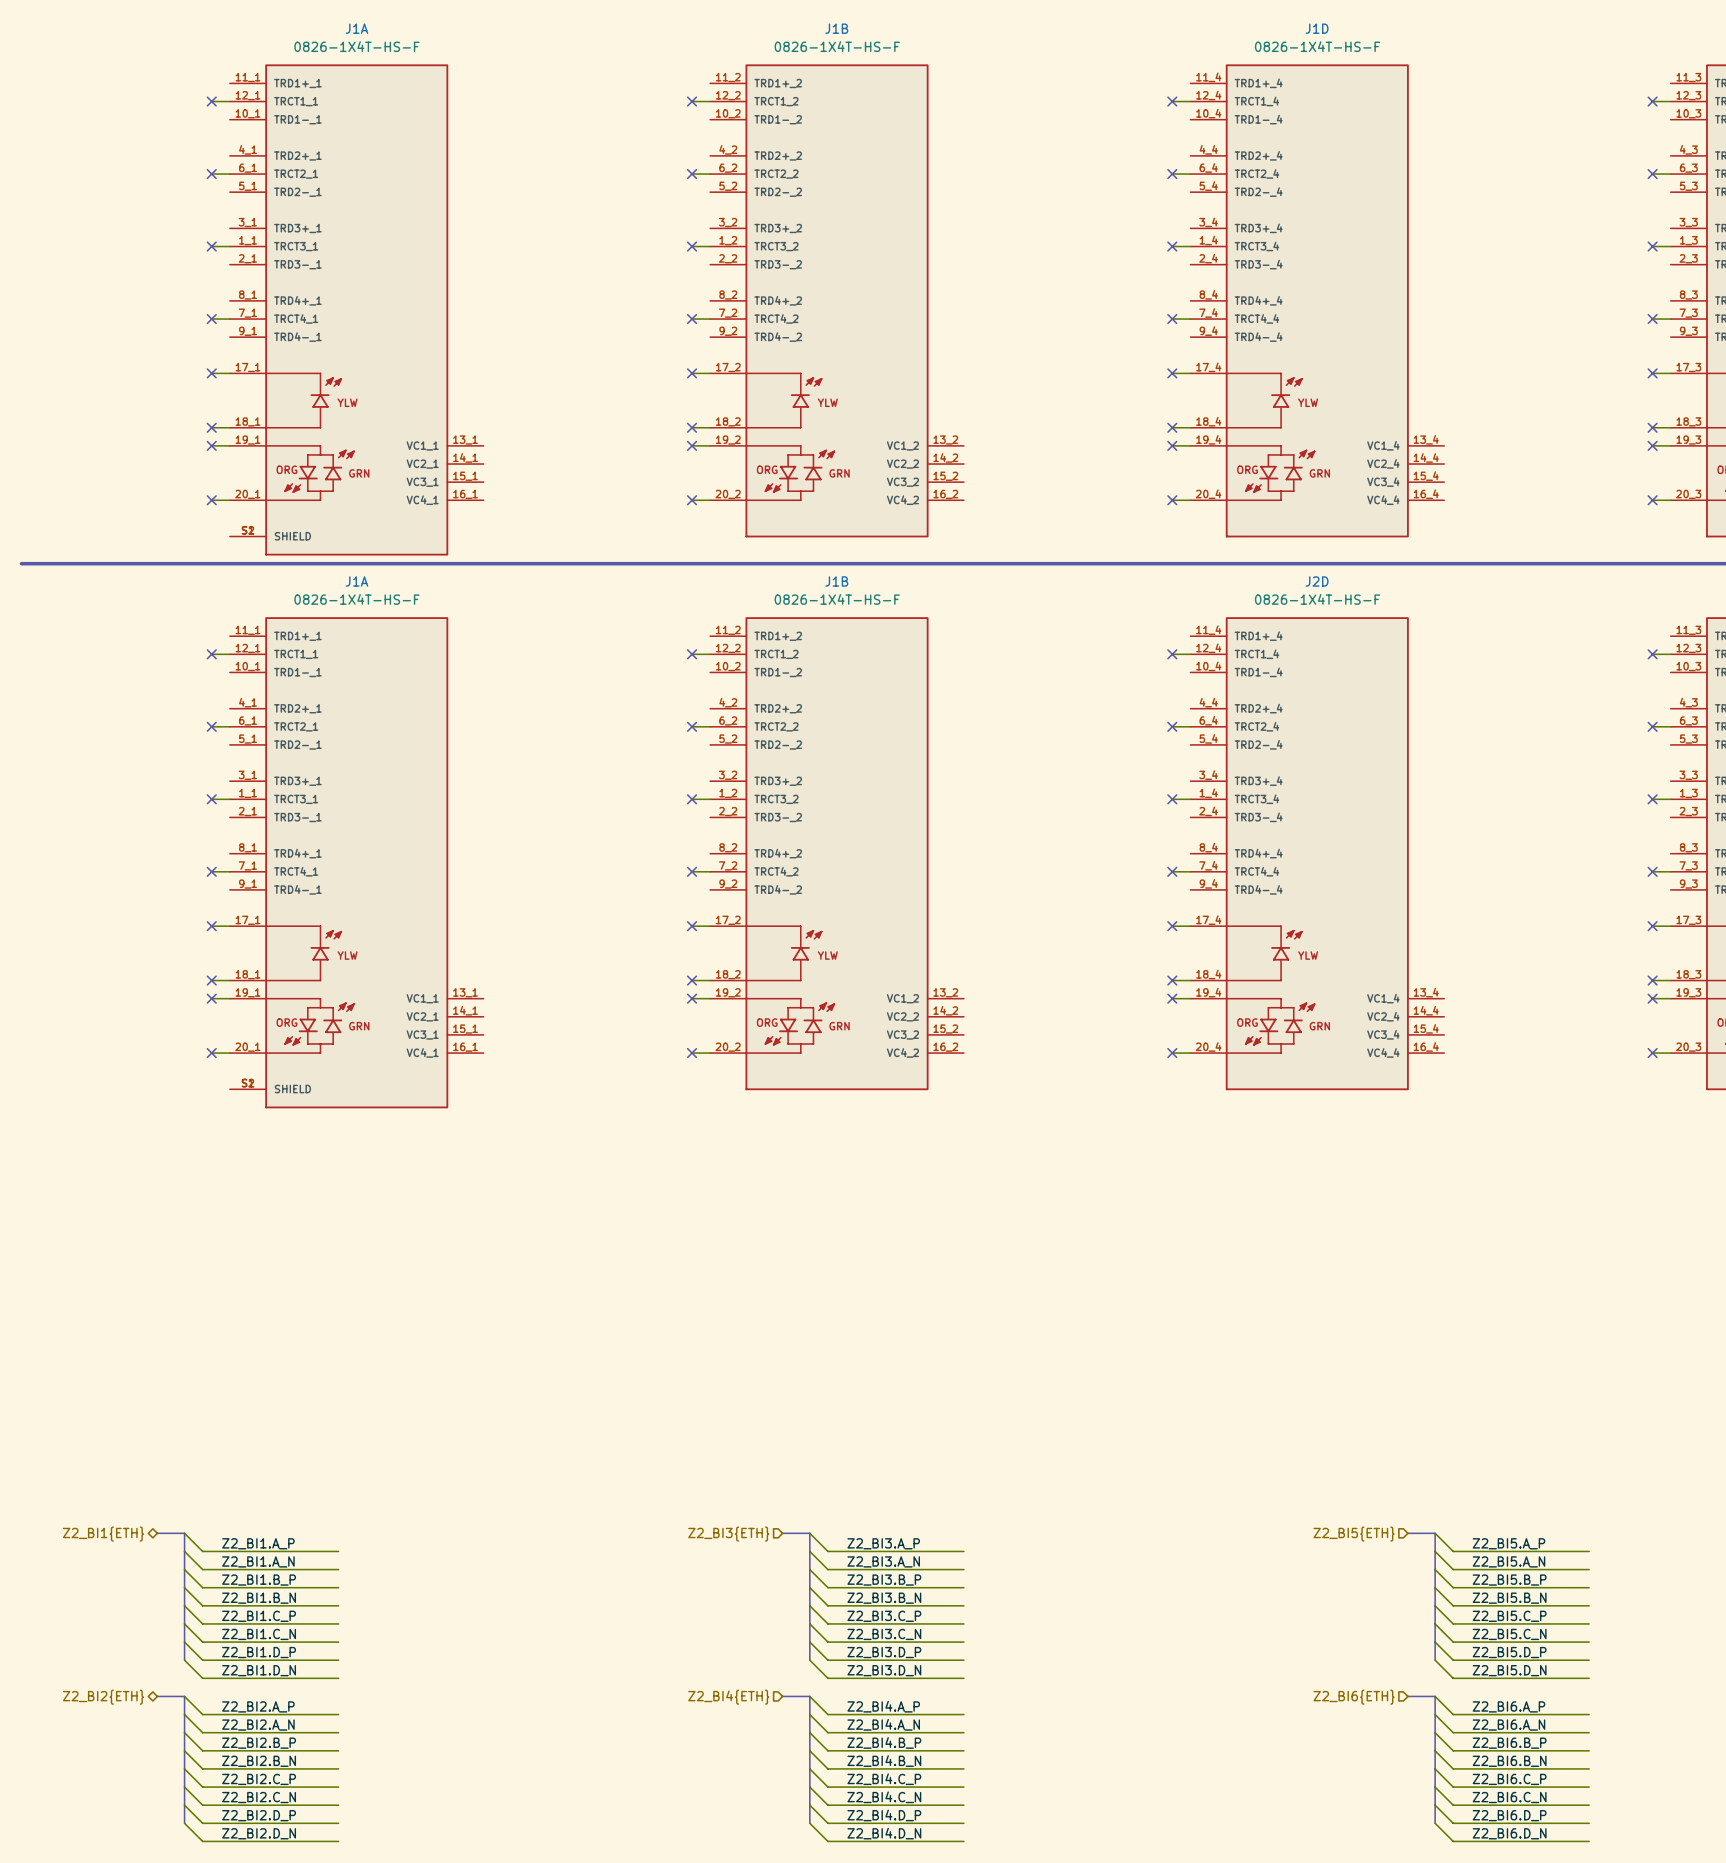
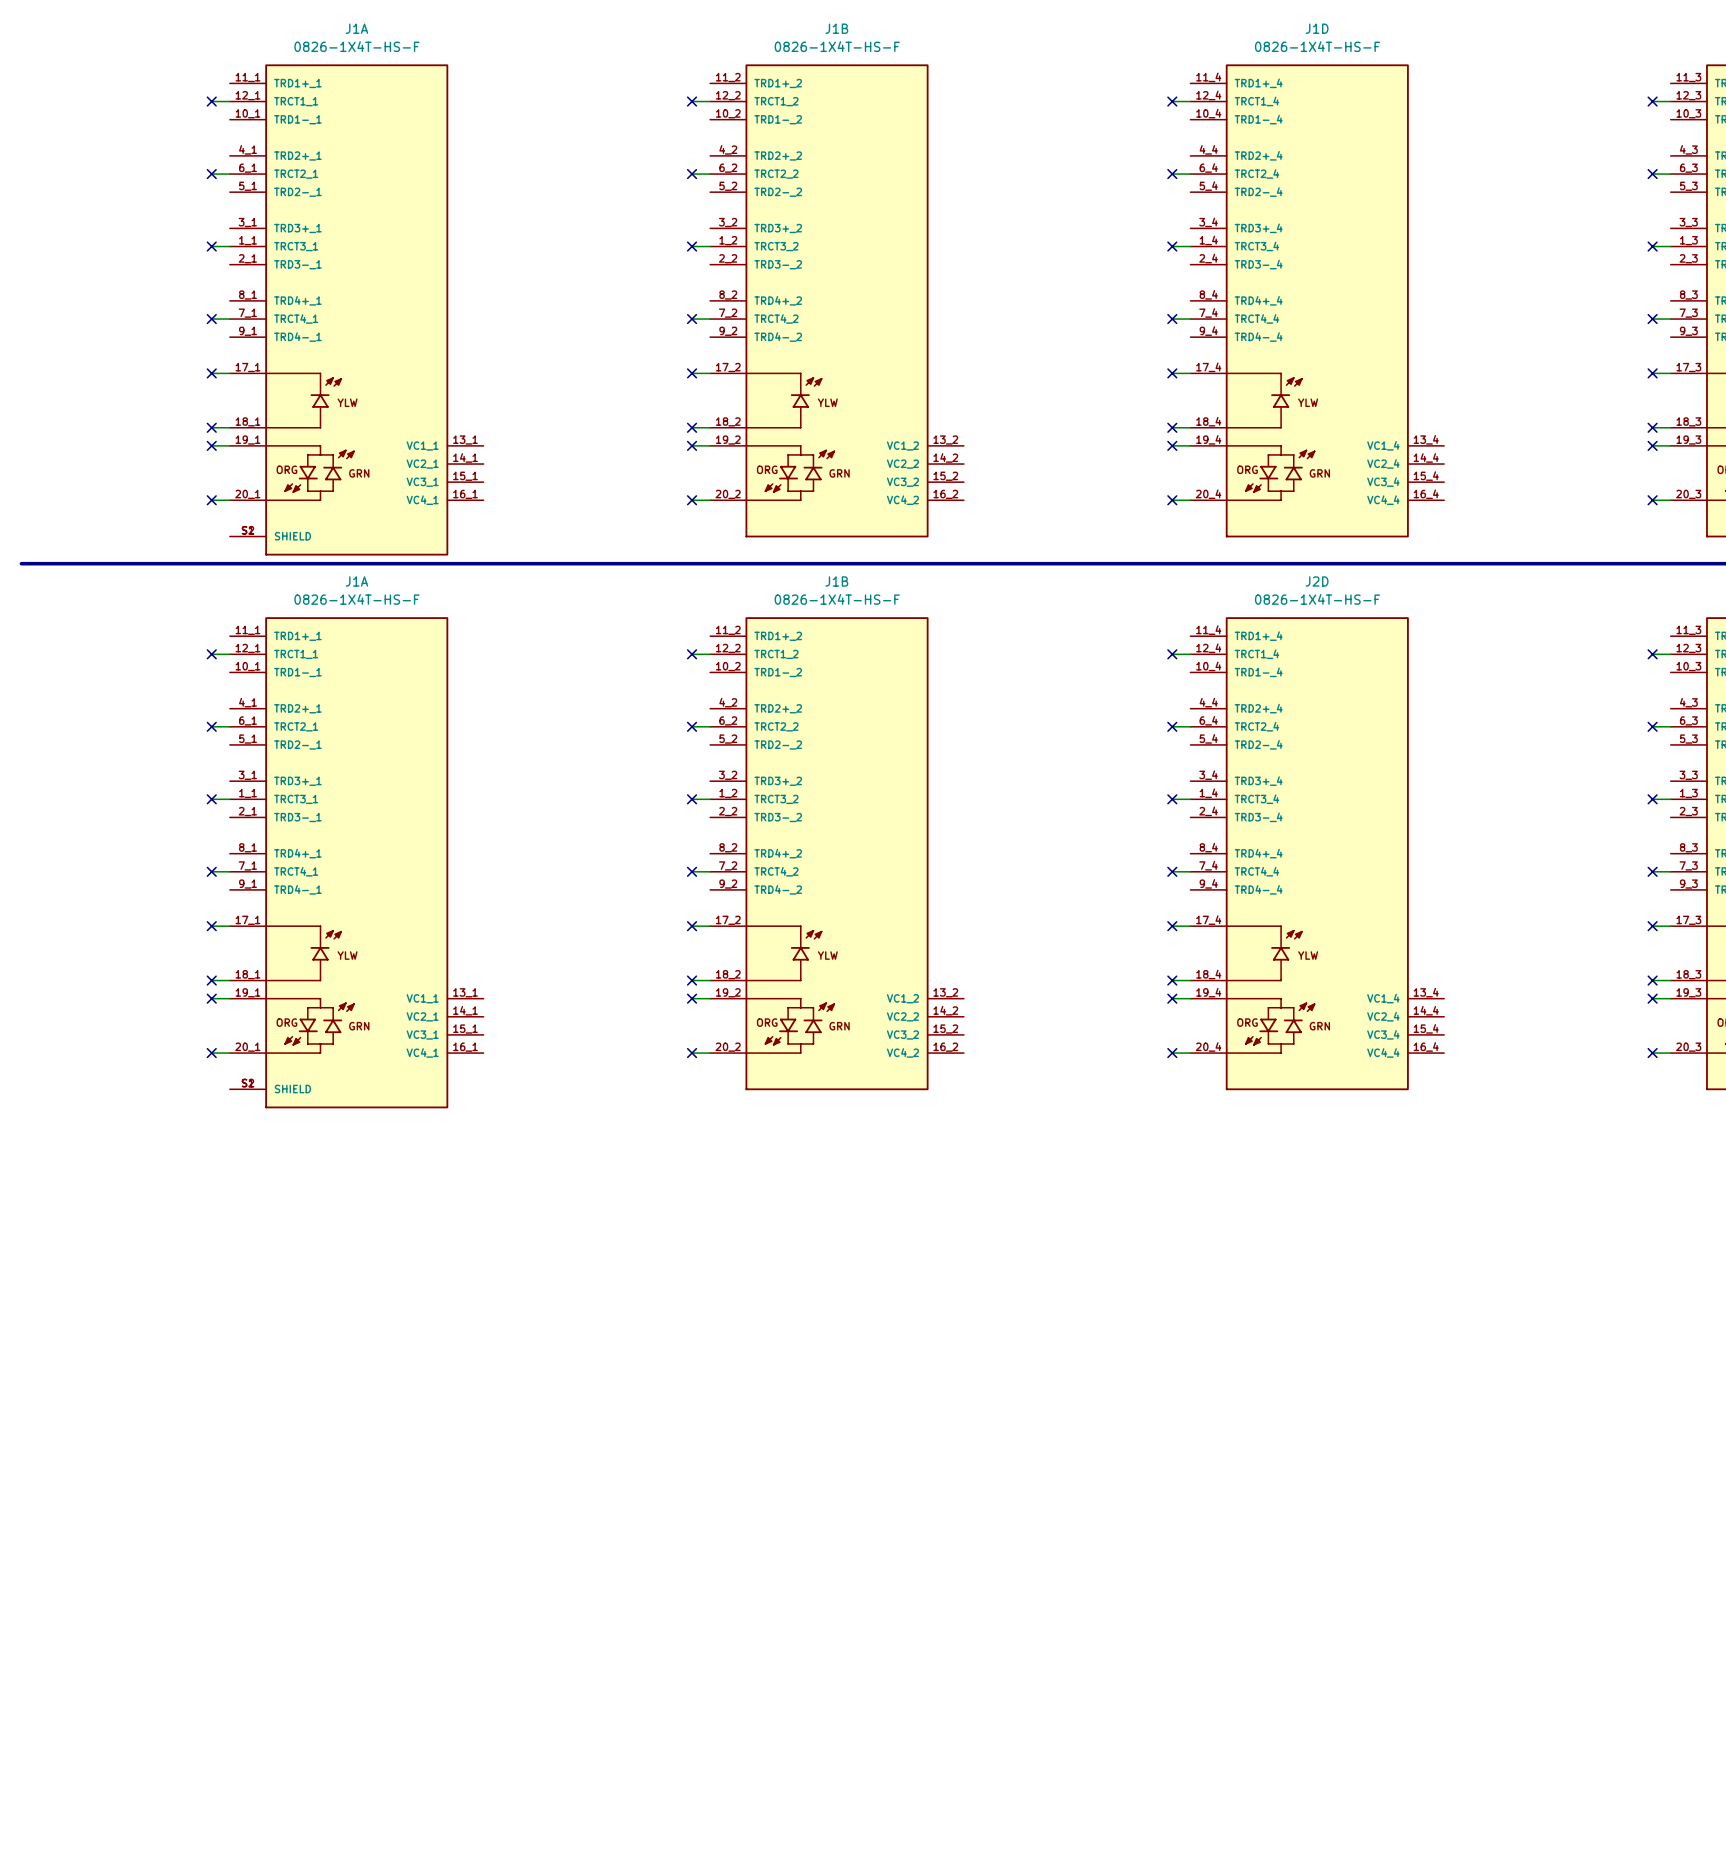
bus: (157, 1533) (184, 1533) (184, 1660) -> none
wire: (184, 1533) (202, 1551) (338, 1551) -> none
bus: (782, 1533) (809, 1533) (809, 1660) -> none
wire: (809, 1533) (827, 1551) (963, 1551) -> none
bus: (1407, 1533) (1435, 1533) (1435, 1660) -> none
wire: (1435, 1533) (1453, 1551) (1589, 1551) -> none
hierarchical label: Z2_BI1{ETH} (103, 1534) -> none
hierarchical label: Z2_BI3{ETH} (728, 1534) -> none
hierarchical label: Z2_BI5{ETH} (1354, 1534) -> none
label: Z2_BI1.A_P (258, 1543) -> none
label: Z2_BI3.A_P (883, 1543) -> none
label: Z2_BI5.A_P (1508, 1543) -> none
wire: (184, 1551) (202, 1569) (338, 1569) -> none
wire: (809, 1551) (827, 1569) (963, 1569) -> none
wire: (1435, 1551) (1453, 1569) (1589, 1569) -> none
label: Z2_BI1.A_N (258, 1561) -> none
label: Z2_BI3.A_N (883, 1561) -> none
label: Z2_BI5.A_N (1508, 1561) -> none
wire: (184, 1569) (202, 1587) (338, 1587) -> none
wire: (809, 1569) (827, 1587) (963, 1587) -> none
wire: (1435, 1569) (1453, 1587) (1589, 1587) -> none
label: Z2_BI1.B_P (259, 1580) -> none
label: Z2_BI3.B_P (884, 1580) -> none
label: Z2_BI5.B_P (1509, 1580) -> none
wire: (184, 1587) (202, 1605) (338, 1605) -> none
wire: (809, 1587) (827, 1605) (963, 1605) -> none
wire: (1435, 1587) (1453, 1605) (1589, 1605) -> none
label: Z2_BI1.B_N (259, 1598) -> none
label: Z2_BI3.B_N (884, 1598) -> none
label: Z2_BI5.B_N (1509, 1598) -> none
wire: (184, 1605) (202, 1623) (338, 1623) -> none
wire: (809, 1605) (827, 1623) (963, 1623) -> none
wire: (1435, 1605) (1453, 1623) (1589, 1623) -> none
label: Z2_BI1.C_P (259, 1616) -> none
label: Z2_BI3.C_P (884, 1616) -> none
label: Z2_BI5.C_P (1509, 1616) -> none
wire: (184, 1623) (202, 1642) (338, 1642) -> none
wire: (809, 1623) (827, 1642) (963, 1642) -> none
wire: (1435, 1623) (1453, 1642) (1589, 1642) -> none
label: Z2_BI1.C_N (259, 1634) -> none
label: Z2_BI3.C_N (884, 1634) -> none
label: Z2_BI5.C_N (1509, 1634) -> none
wire: (184, 1642) (202, 1660) (338, 1660) -> none
wire: (809, 1642) (827, 1660) (963, 1660) -> none
wire: (1435, 1642) (1453, 1660) (1589, 1660) -> none
label: Z2_BI1.D_P (259, 1652) -> none
label: Z2_BI3.D_P (884, 1652) -> none
label: Z2_BI5.D_P (1509, 1652) -> none
wire: (184, 1660) (202, 1678) (338, 1678) -> none
wire: (809, 1660) (827, 1678) (963, 1678) -> none
wire: (1435, 1660) (1453, 1678) (1589, 1678) -> none
label: Z2_BI1.D_N (259, 1670) -> none
label: Z2_BI3.D_N (884, 1670) -> none
label: Z2_BI5.D_N (1509, 1670) -> none
bus: (157, 1696) (184, 1696) (184, 1823) -> none
wire: (184, 1696) (202, 1714) (338, 1714) -> none
bus: (782, 1696) (809, 1696) (809, 1823) -> none
wire: (809, 1696) (827, 1714) (963, 1714) -> none
bus: (1407, 1696) (1435, 1696) (1435, 1823) -> none
wire: (1435, 1696) (1453, 1714) (1589, 1714) -> none
hierarchical label: Z2_BI2{ETH} (103, 1697) -> none
hierarchical label: Z2_BI4{ETH} (728, 1697) -> none
hierarchical label: Z2_BI6{ETH} (1354, 1697) -> none
label: Z2_BI2.A_P (258, 1706) -> none
label: Z2_BI4.A_P (883, 1706) -> none
label: Z2_BI6.A_P (1508, 1706) -> none
wire: (184, 1714) (202, 1732) (338, 1732) -> none
wire: (809, 1714) (827, 1732) (963, 1732) -> none
wire: (1435, 1714) (1453, 1732) (1589, 1732) -> none
label: Z2_BI4.A_N (883, 1724) -> none
label: Z2_BI2.A_N (258, 1725) -> none
label: Z2_BI6.A_N (1508, 1725) -> none
wire: (184, 1732) (202, 1750) (338, 1750) -> none
wire: (809, 1732) (827, 1750) (963, 1750) -> none
wire: (1435, 1732) (1453, 1750) (1589, 1750) -> none
label: Z2_BI4.B_P (884, 1742) -> none
label: Z2_BI2.B_P (259, 1743) -> none
label: Z2_BI6.B_P (1509, 1743) -> none
wire: (184, 1750) (202, 1768) (338, 1768) -> none
wire: (809, 1750) (827, 1768) (963, 1768) -> none
wire: (1435, 1750) (1453, 1768) (1589, 1768) -> none
label: Z2_BI2.B_N (259, 1761) -> none
label: Z2_BI4.B_N (884, 1761) -> none
label: Z2_BI6.B_N (1509, 1761) -> none
wire: (184, 1768) (202, 1787) (338, 1787) -> none
wire: (809, 1768) (827, 1787) (963, 1787) -> none
wire: (1435, 1768) (1453, 1787) (1589, 1787) -> none
label: Z2_BI2.C_P (259, 1779) -> none
label: Z2_BI4.C_P (884, 1779) -> none
label: Z2_BI6.C_P (1509, 1779) -> none
wire: (184, 1787) (202, 1805) (338, 1805) -> none
wire: (809, 1787) (827, 1805) (963, 1805) -> none
wire: (1435, 1787) (1453, 1805) (1589, 1805) -> none
label: Z2_BI2.C_N (259, 1797) -> none
label: Z2_BI4.C_N (884, 1797) -> none
label: Z2_BI6.C_N (1509, 1797) -> none
wire: (184, 1805) (202, 1823) (338, 1823) -> none
wire: (809, 1805) (827, 1823) (963, 1823) -> none
wire: (1435, 1805) (1453, 1823) (1589, 1823) -> none
label: Z2_BI2.D_P (259, 1815) -> none
label: Z2_BI4.D_P (884, 1815) -> none
label: Z2_BI6.D_P (1509, 1815) -> none
wire: (184, 1823) (202, 1841) (338, 1841) -> none
wire: (809, 1823) (827, 1841) (963, 1841) -> none
wire: (1435, 1823) (1453, 1841) (1589, 1841) -> none
label: Z2_BI2.D_N (259, 1833) -> none
label: Z2_BI4.D_N (884, 1833) -> none
label: Z2_BI6.D_N (1509, 1833) -> none

